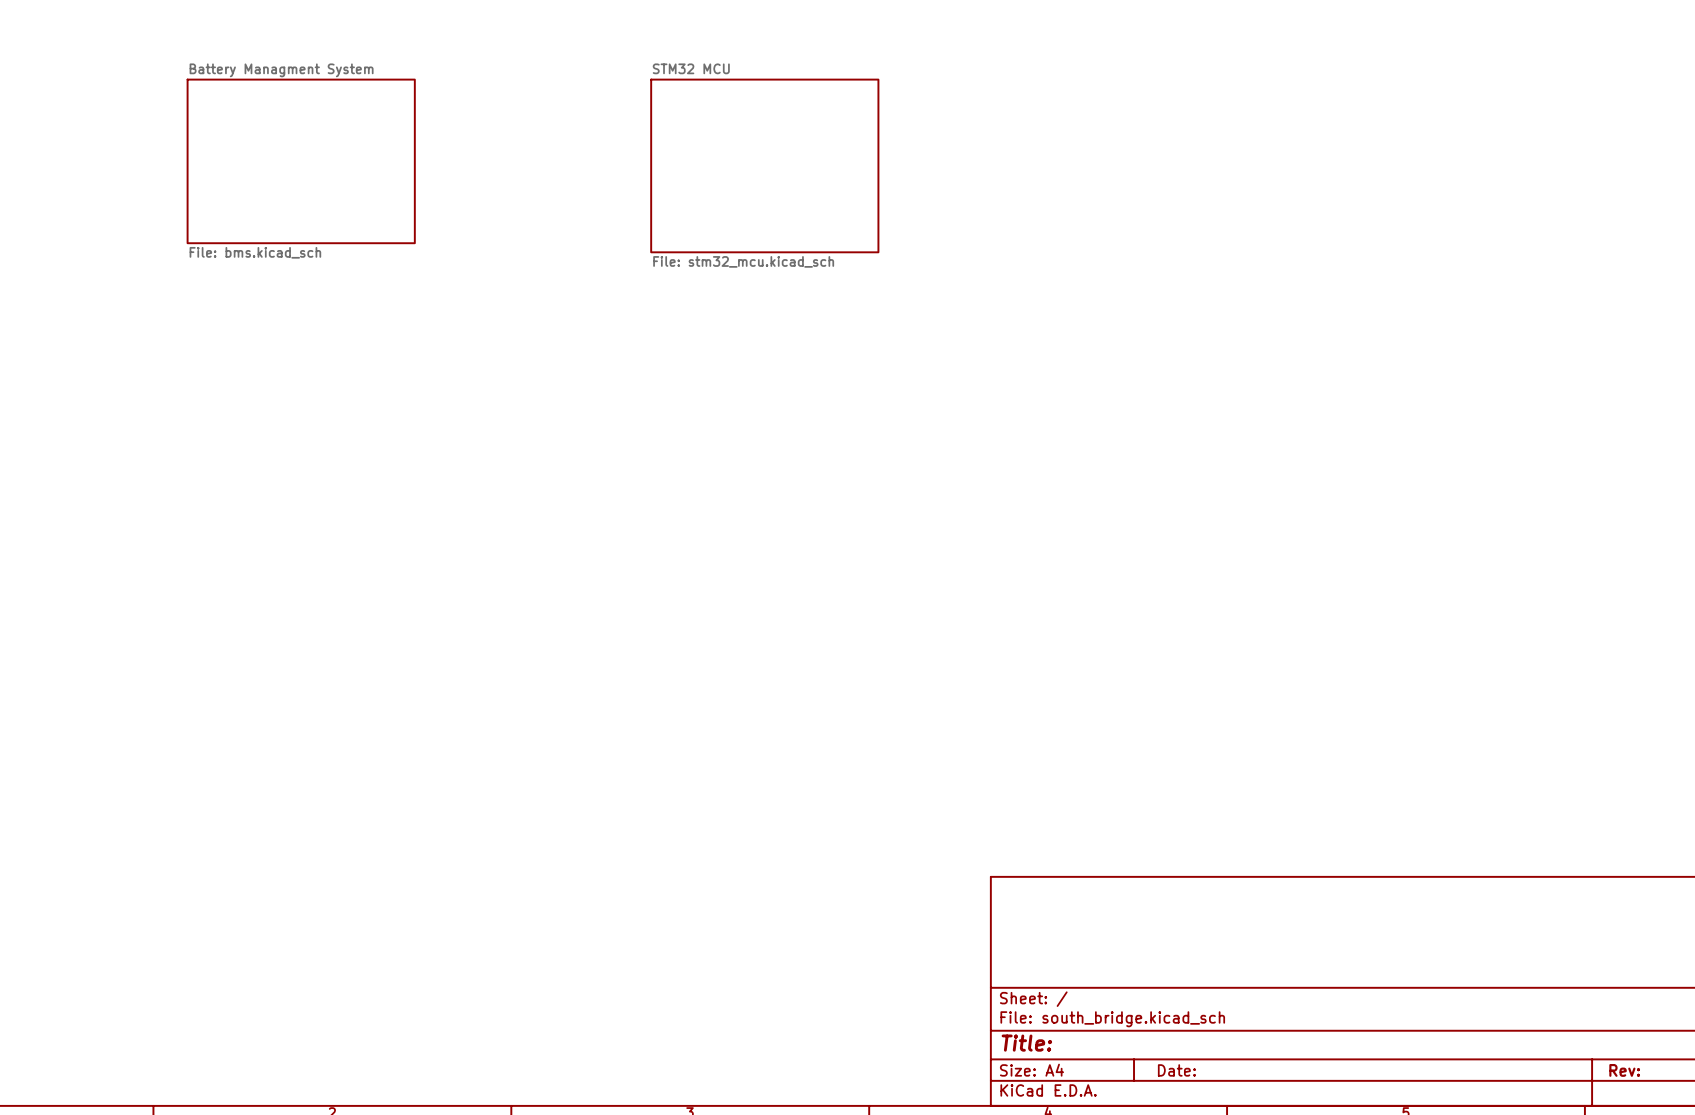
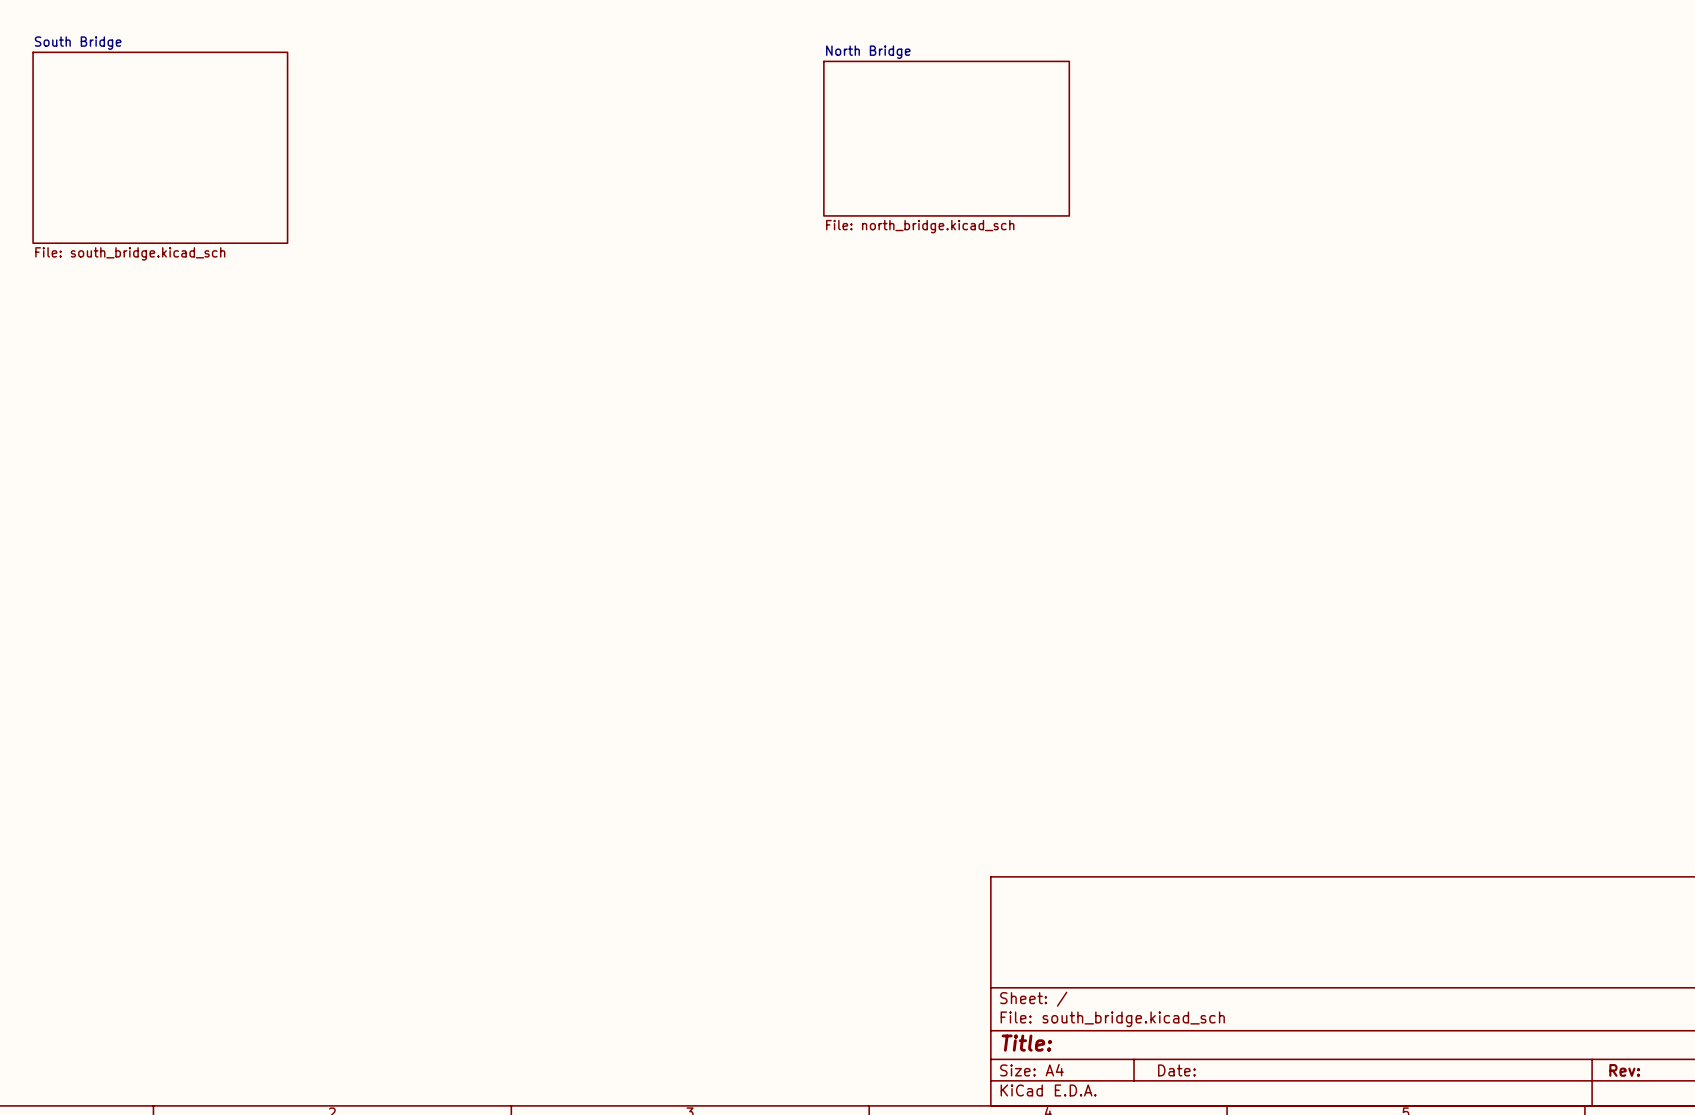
sheet North Bridge: none -> File: north_bridge.kicad_sch (946, 138)
sheet South Bridge: none -> File: south_bridge.kicad_sch (160, 147)
sheet Battery Managment System: File: bms.kicad_sch (301, 161) -> none
sheet STM32 MCU: File: stm32_mcu.kicad_sch (764, 165) -> none

